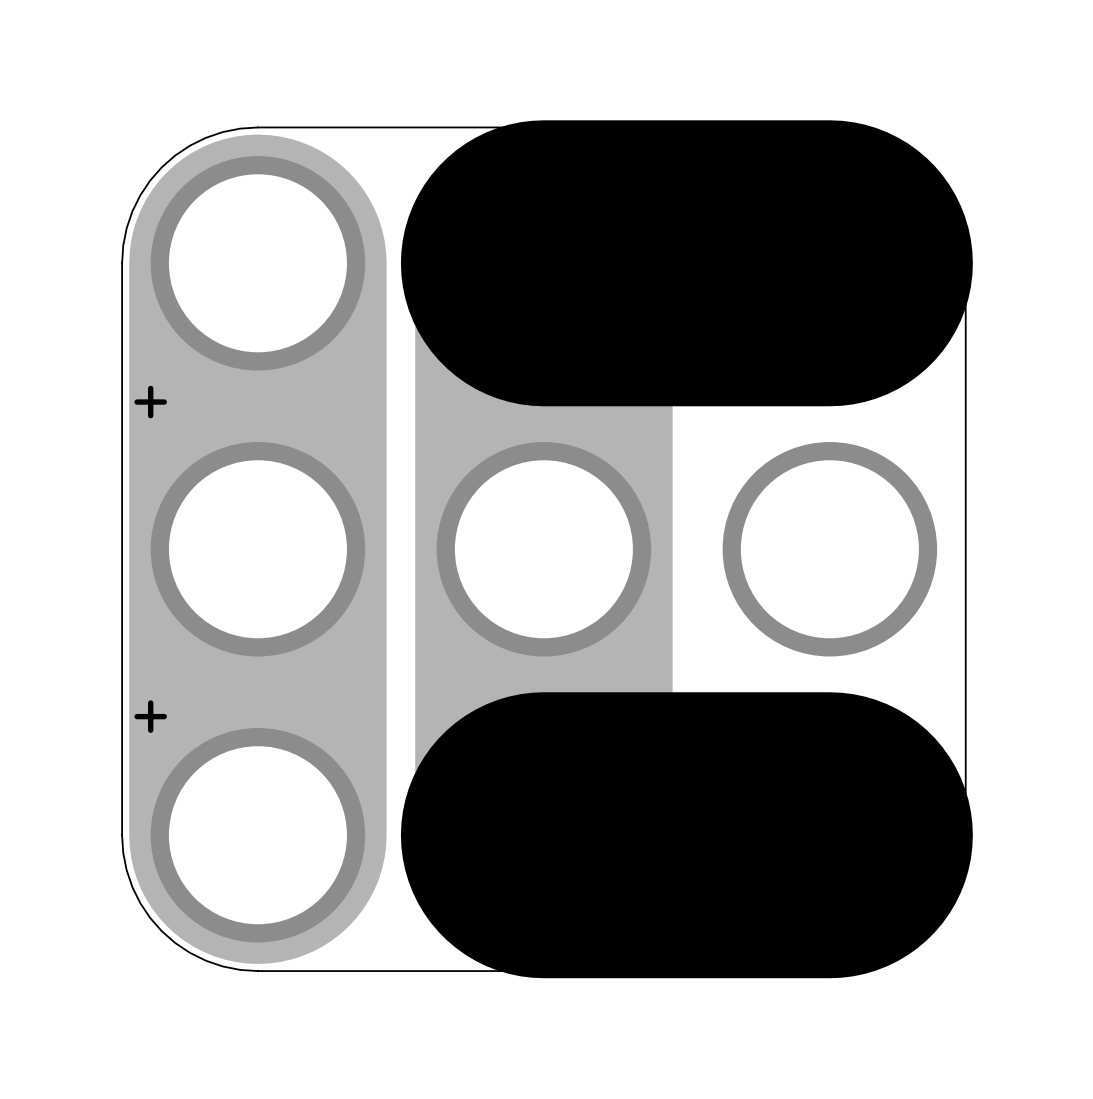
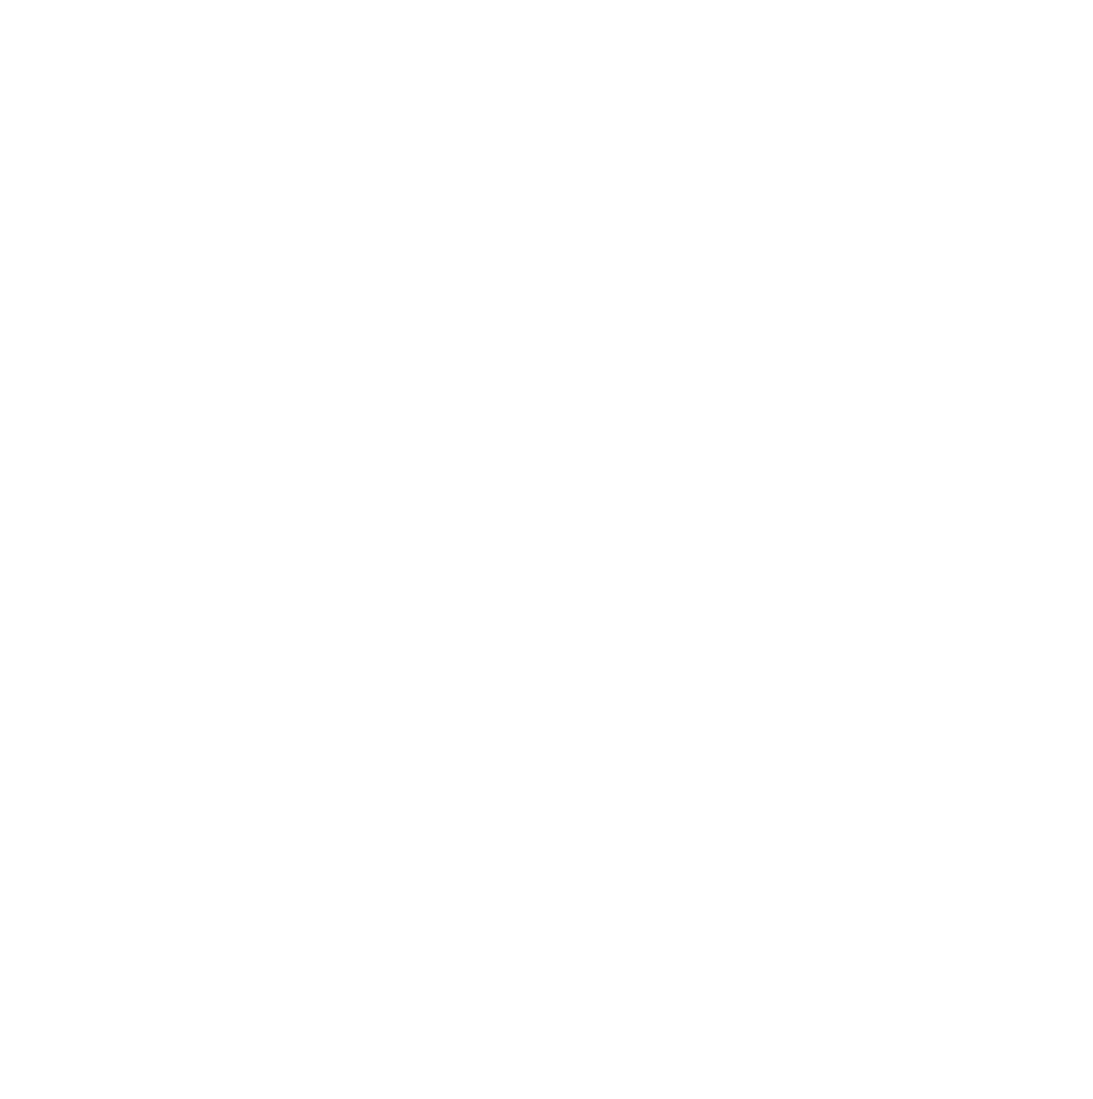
part: (547, 549) -> none

